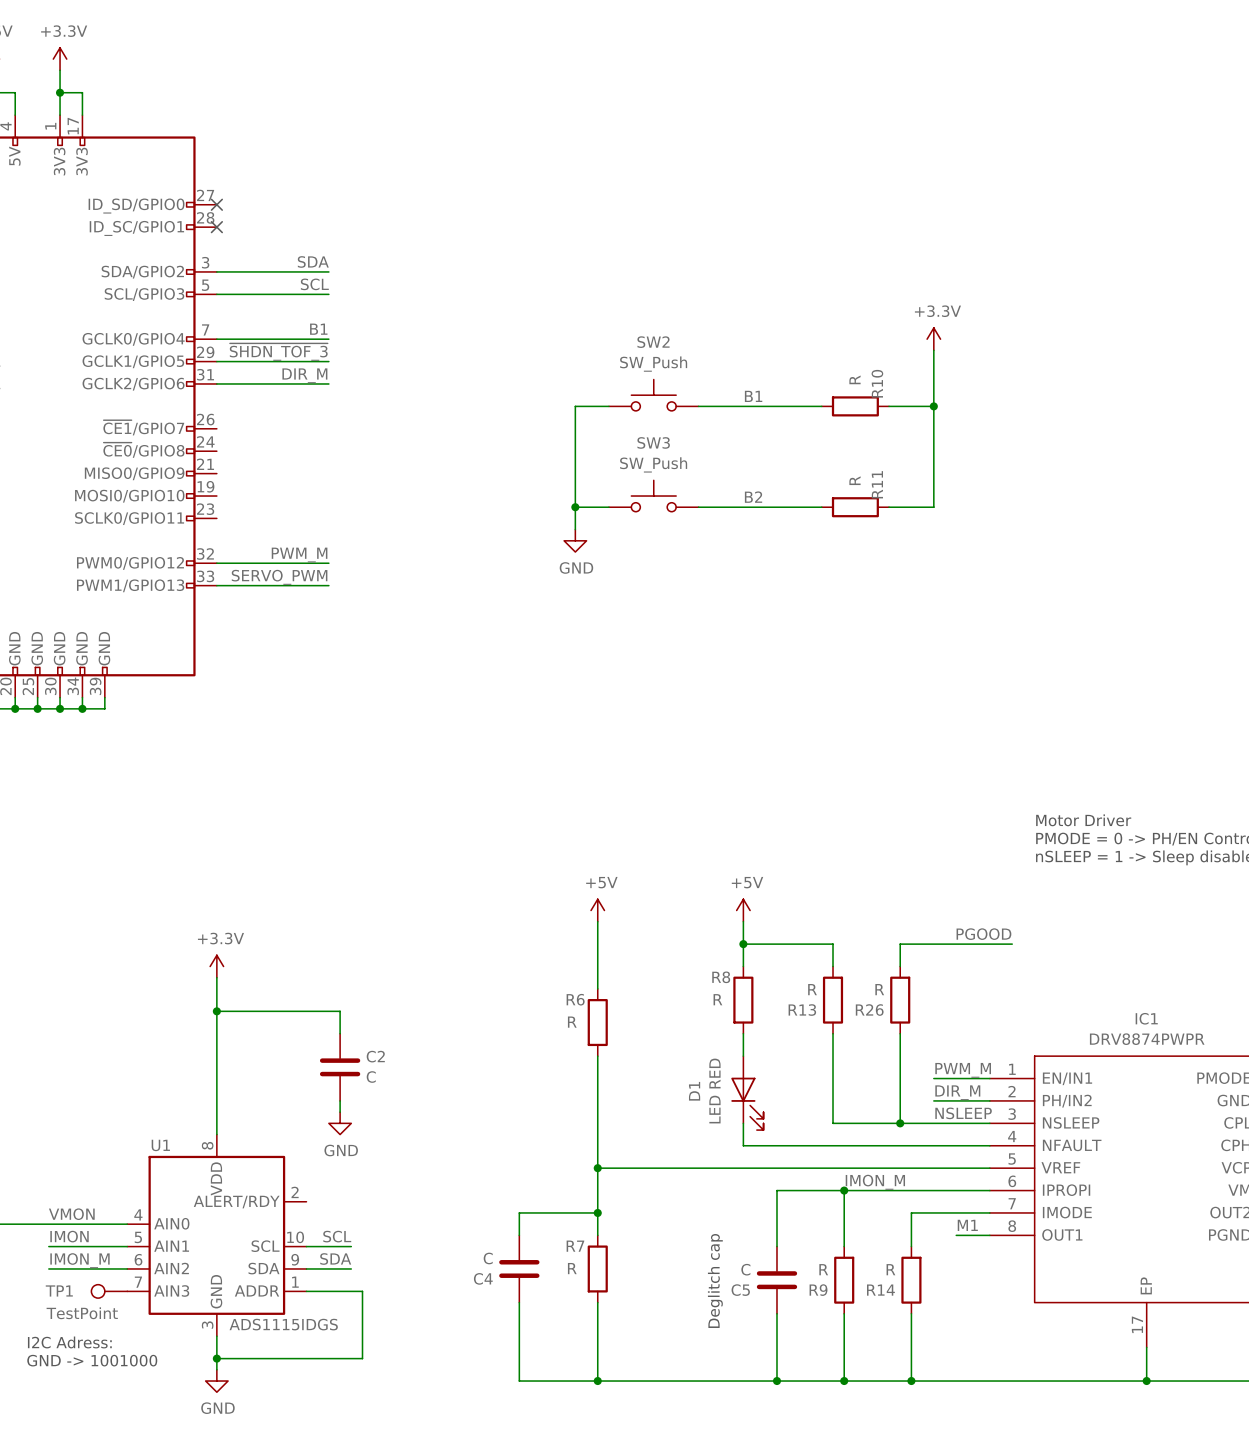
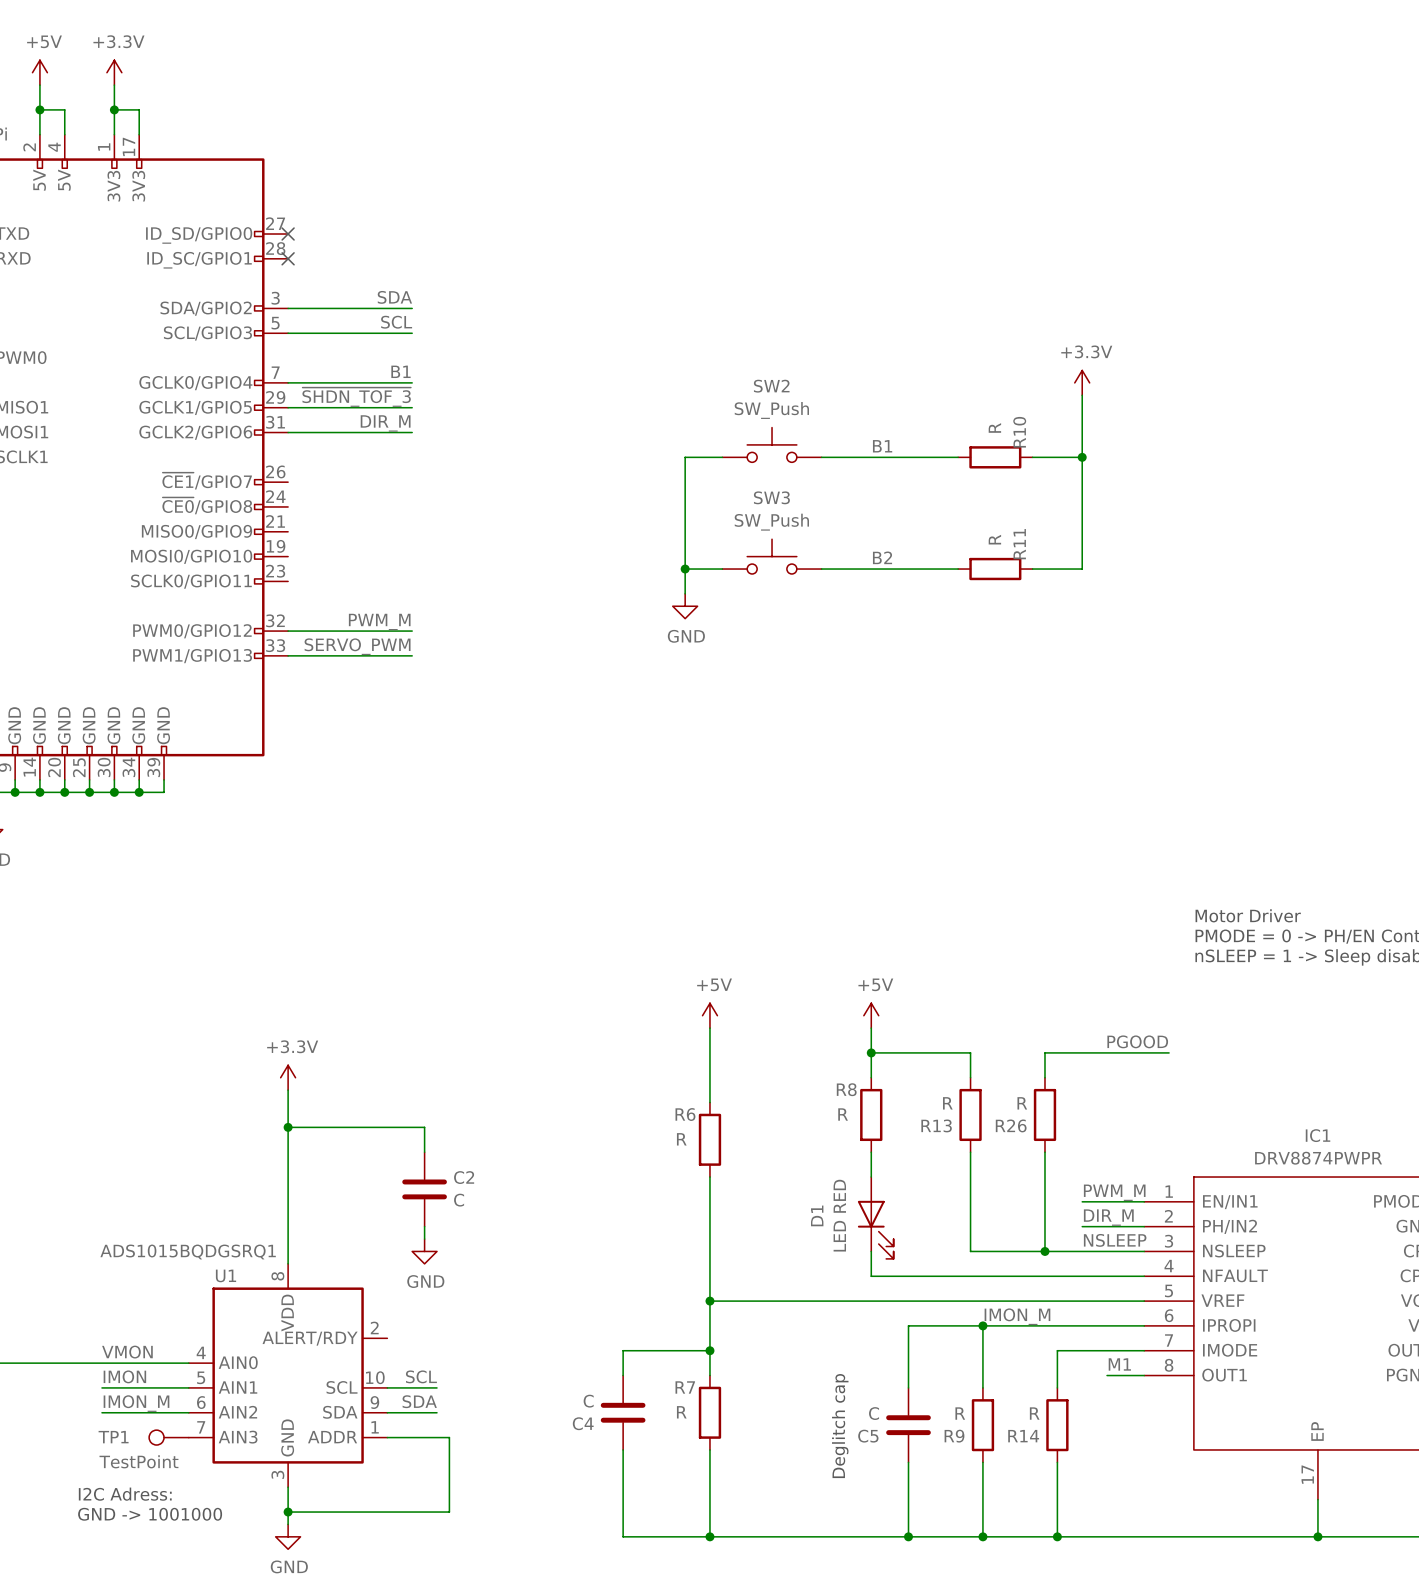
U1 value: ADS1115IDGS (283, 1324) -> ADS1015BQDGSRQ1 (188, 1251)

